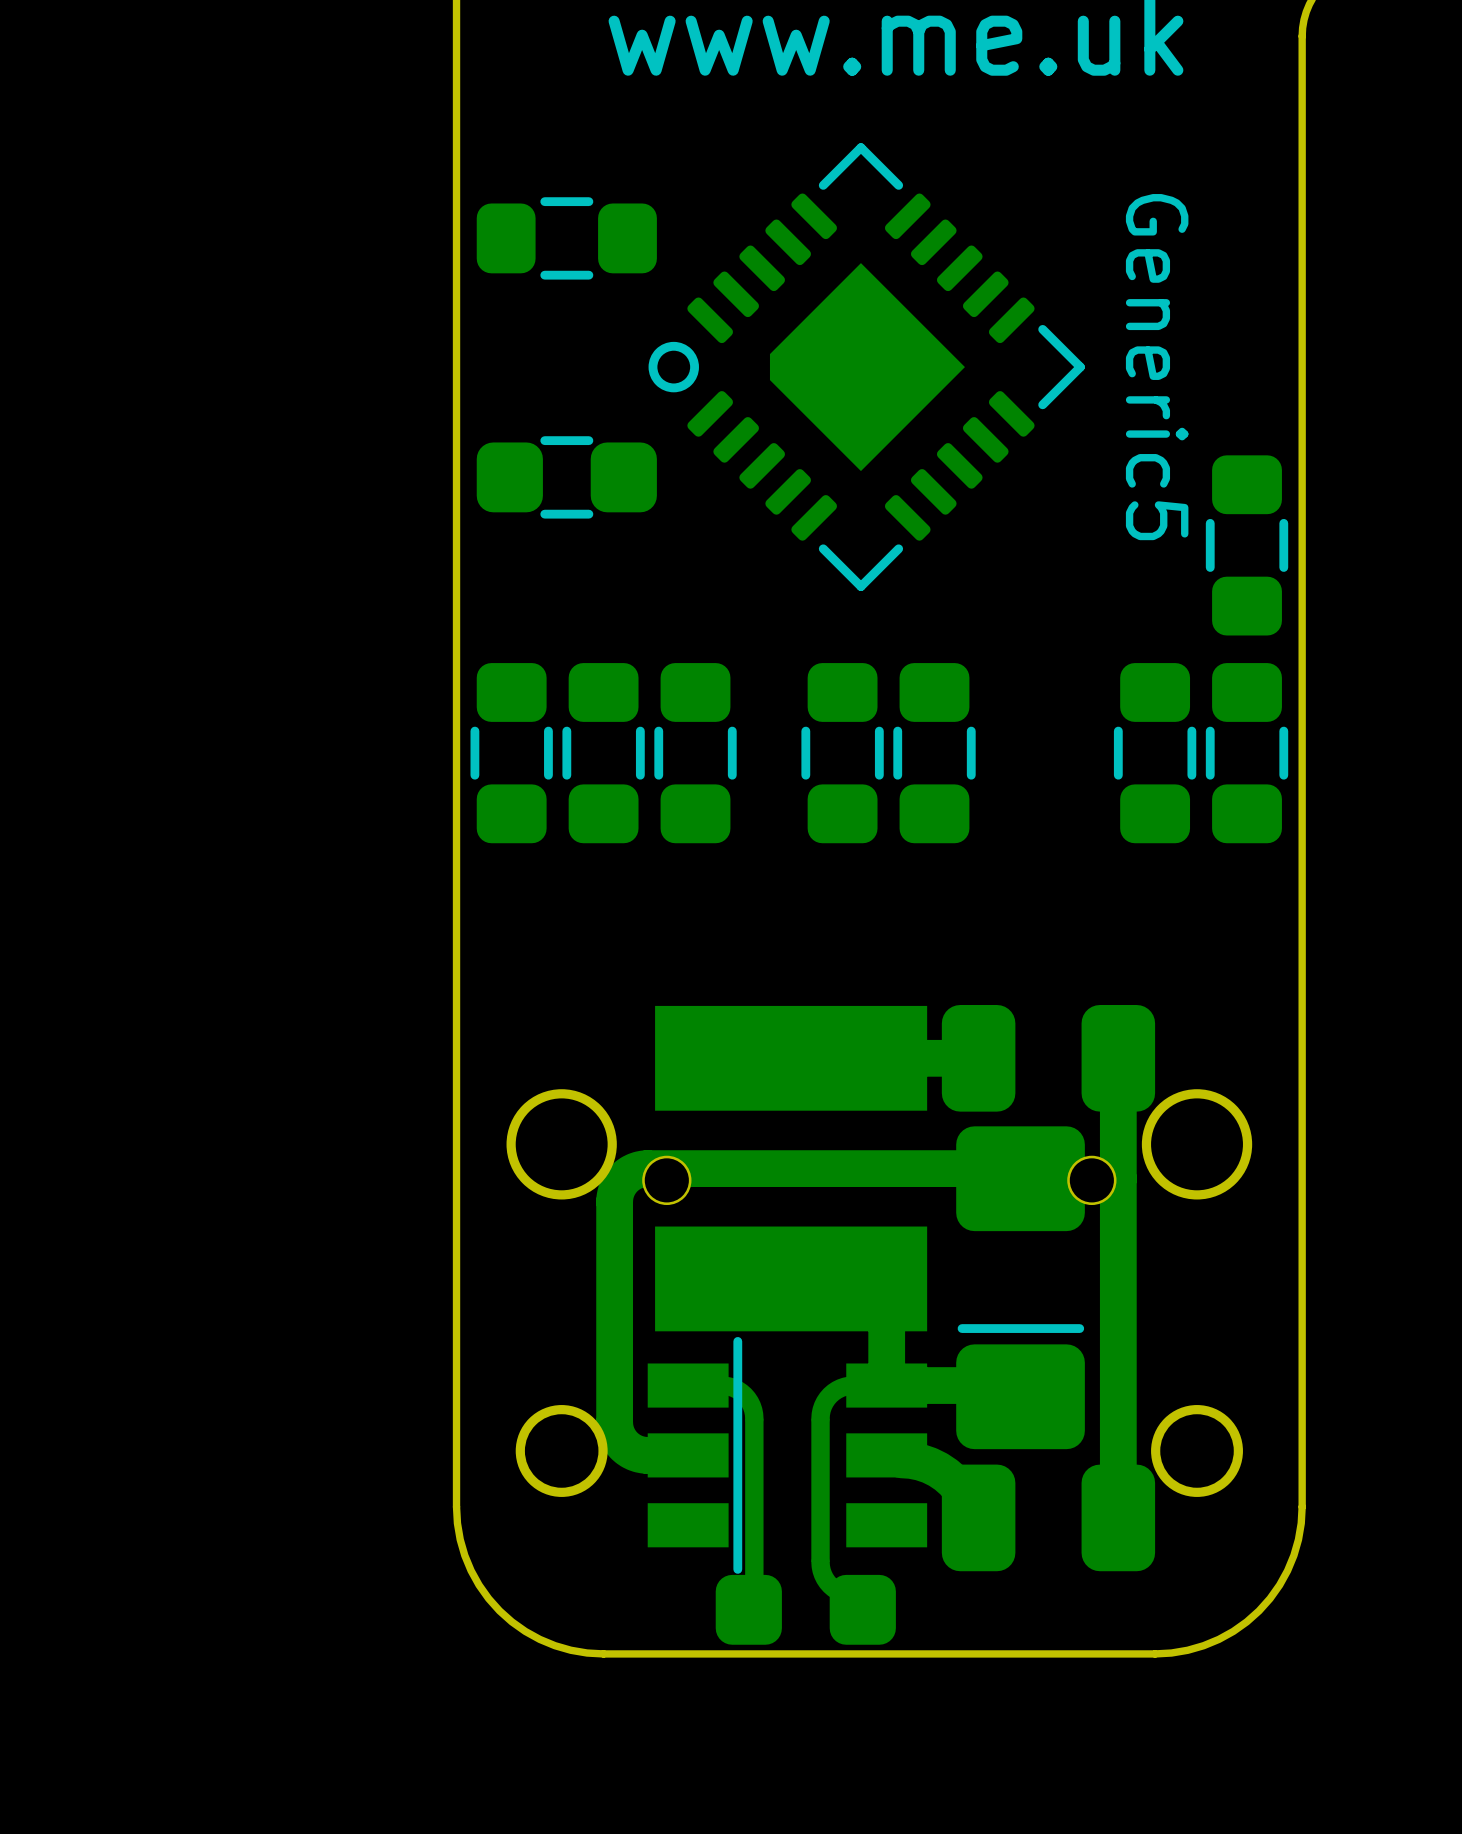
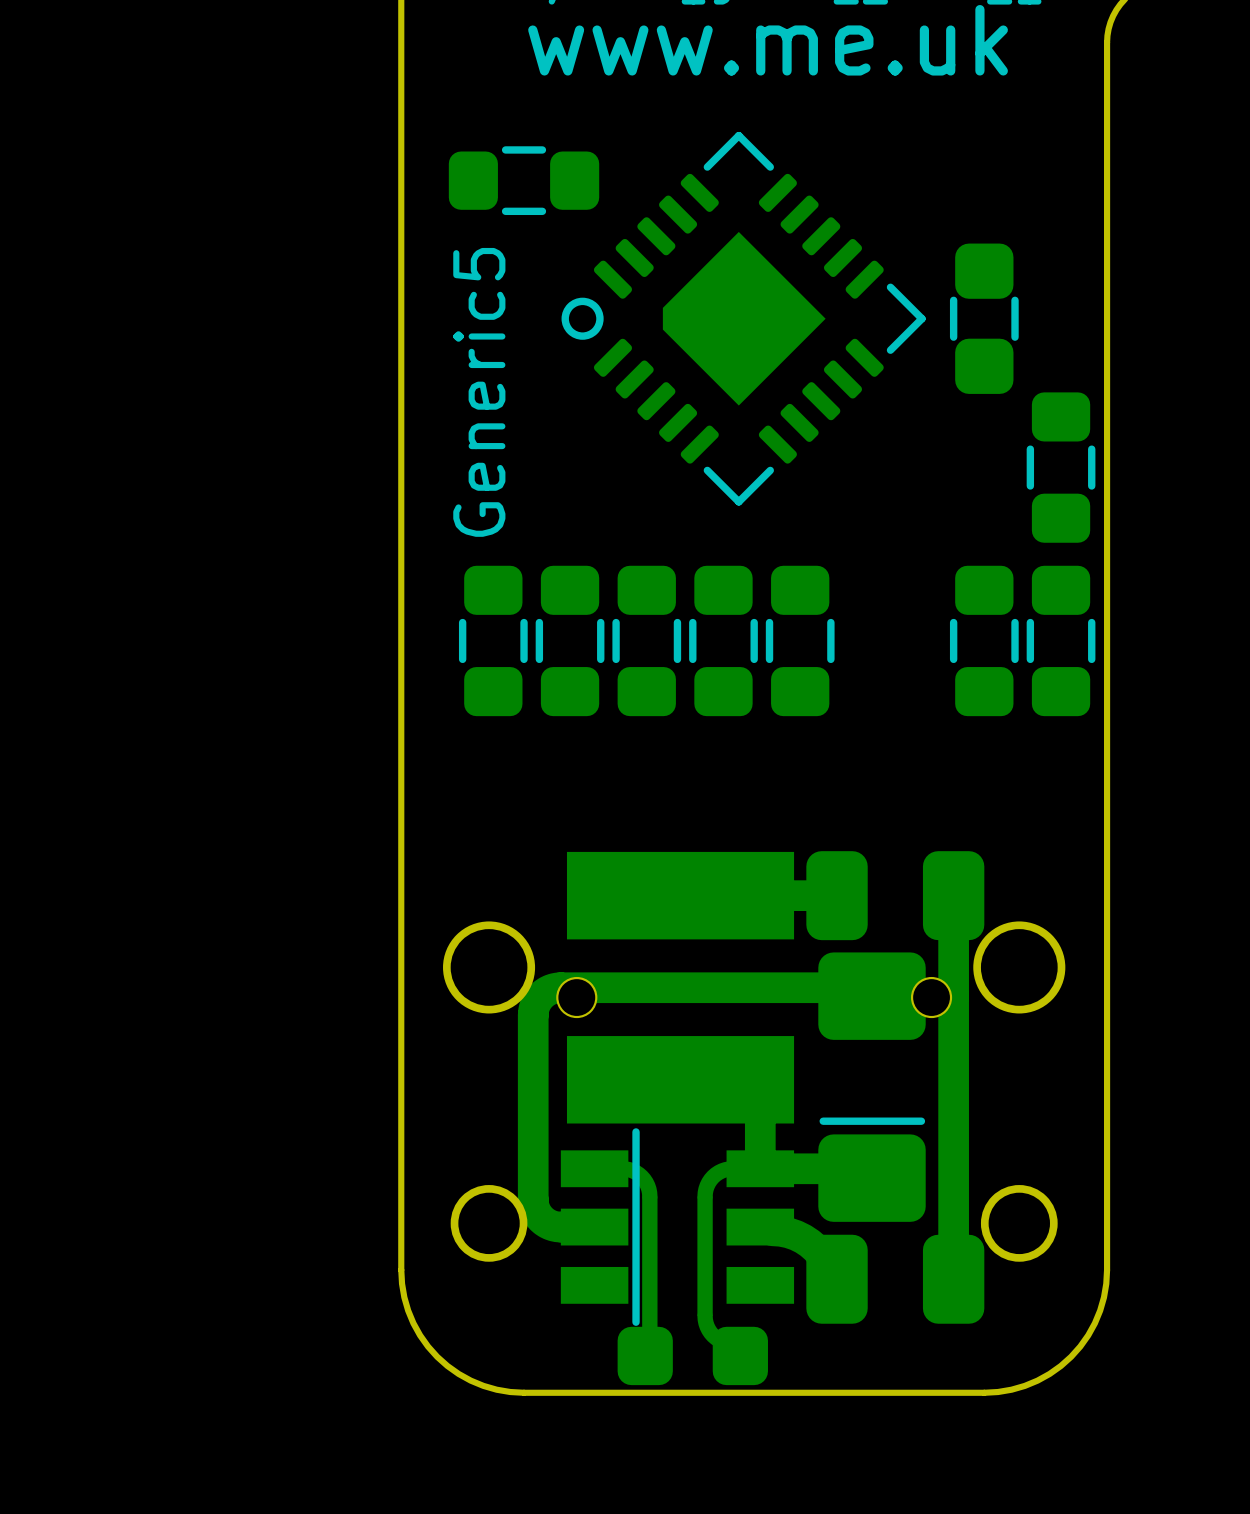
part position: (566, 238) -> (524, 180)
text rotation: 0° (1157, 367) -> 180° (479, 392)
text position: Generic5 (1157, 367) -> Generic5 (479, 392)
part rotation: 0° (566, 477) -> 90° clockwise (984, 318)
part position: (566, 477) -> (984, 318)
part: (511, 753) -> none
part: none -> (493, 640)
part: (603, 753) -> none
part: none -> (570, 640)
part: (695, 753) -> none
part: none -> (646, 640)

